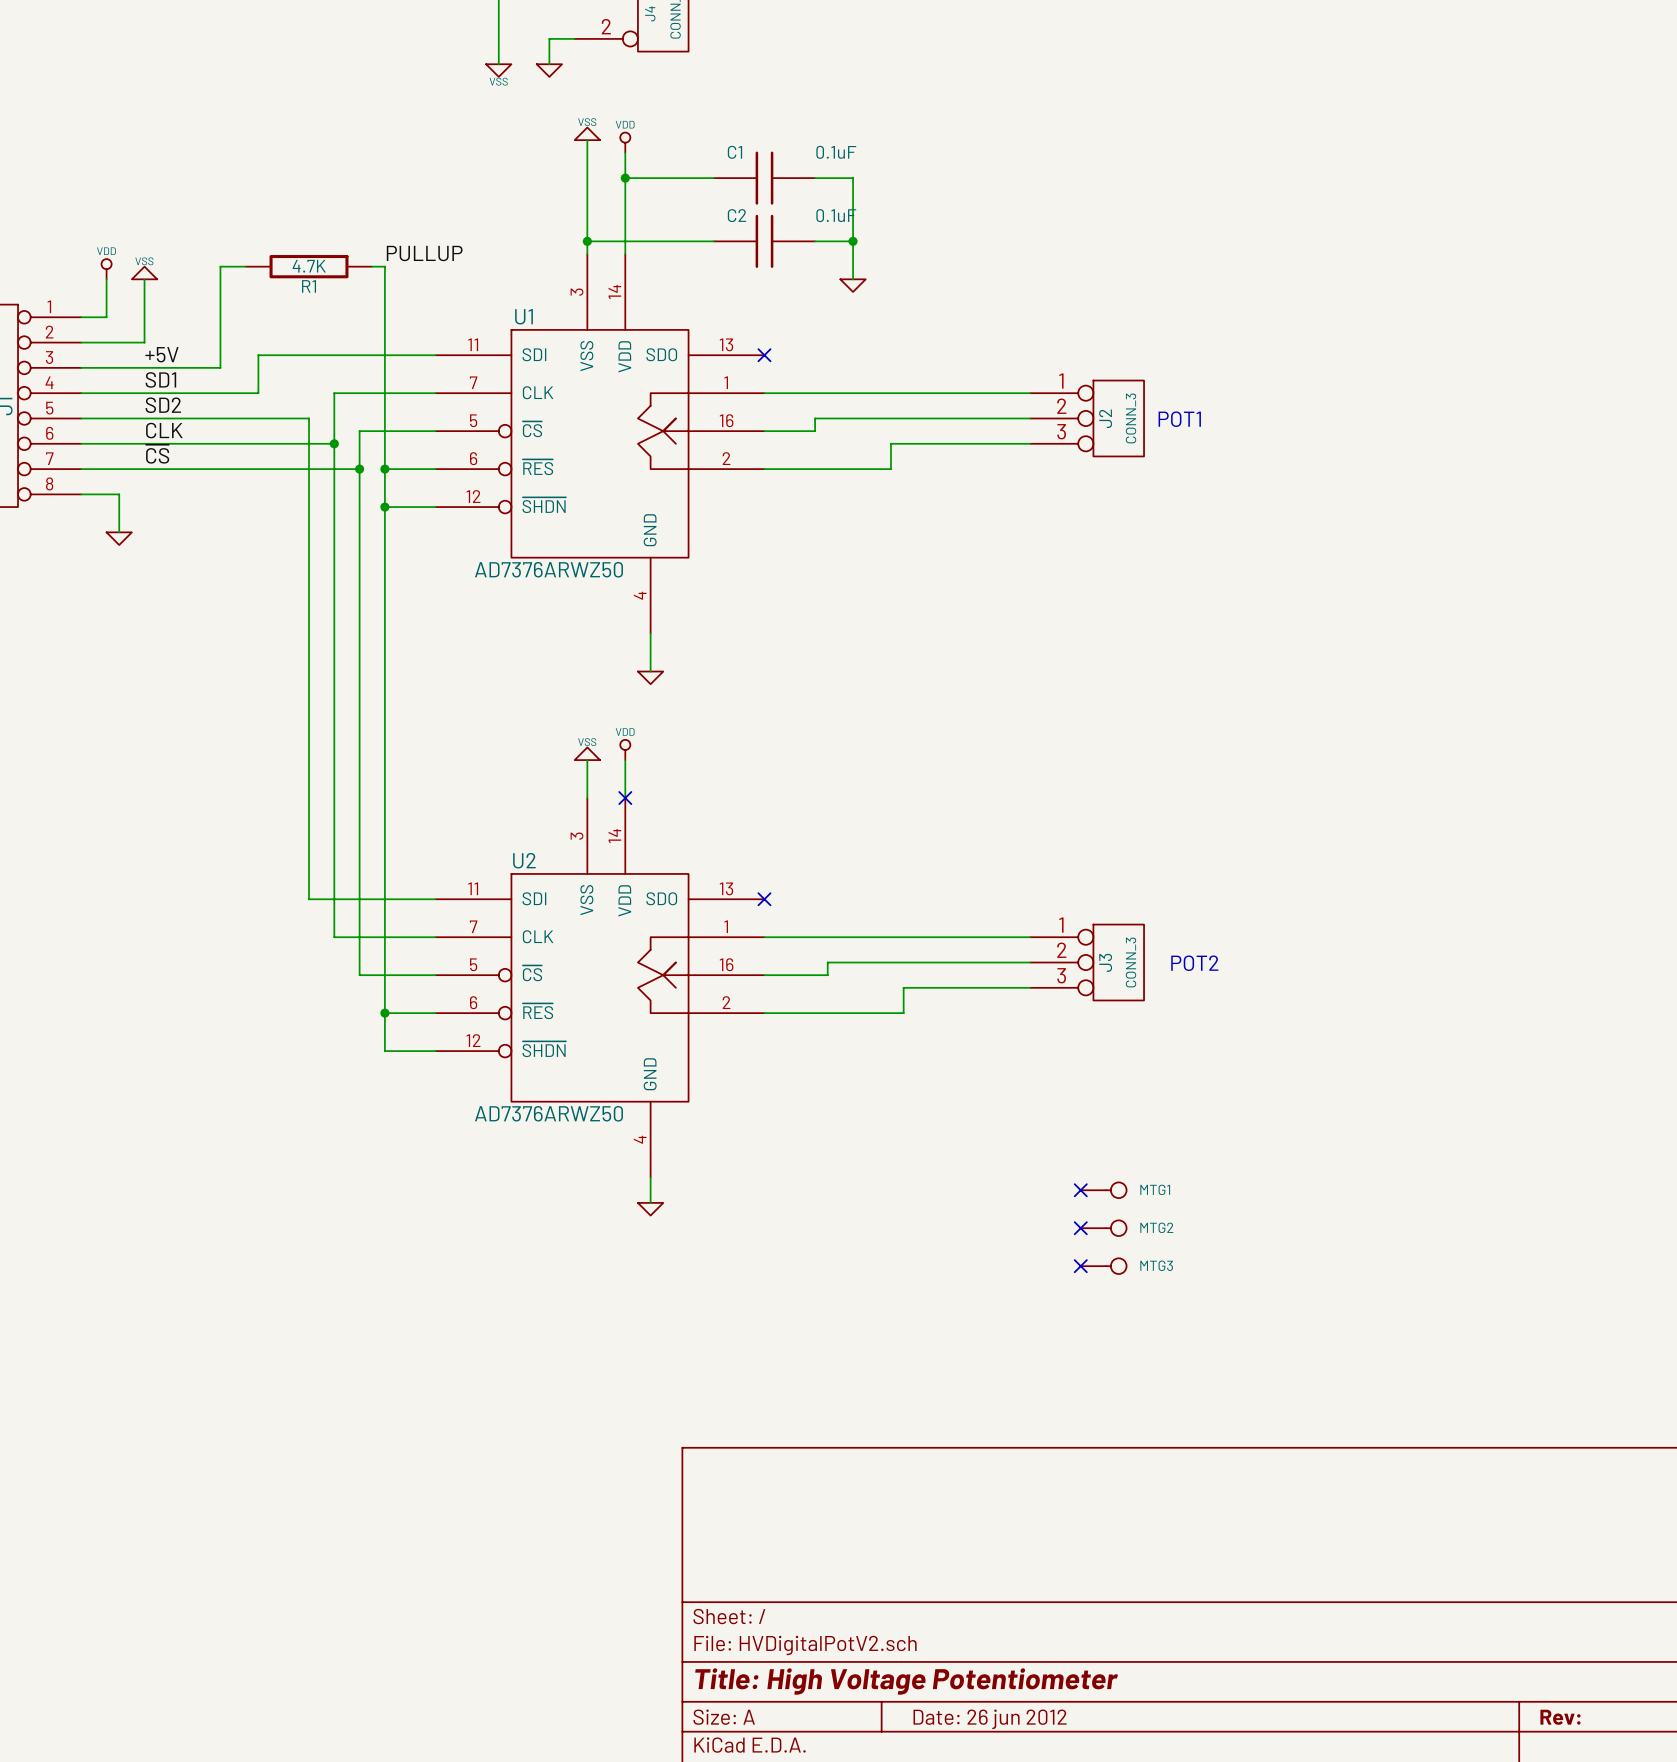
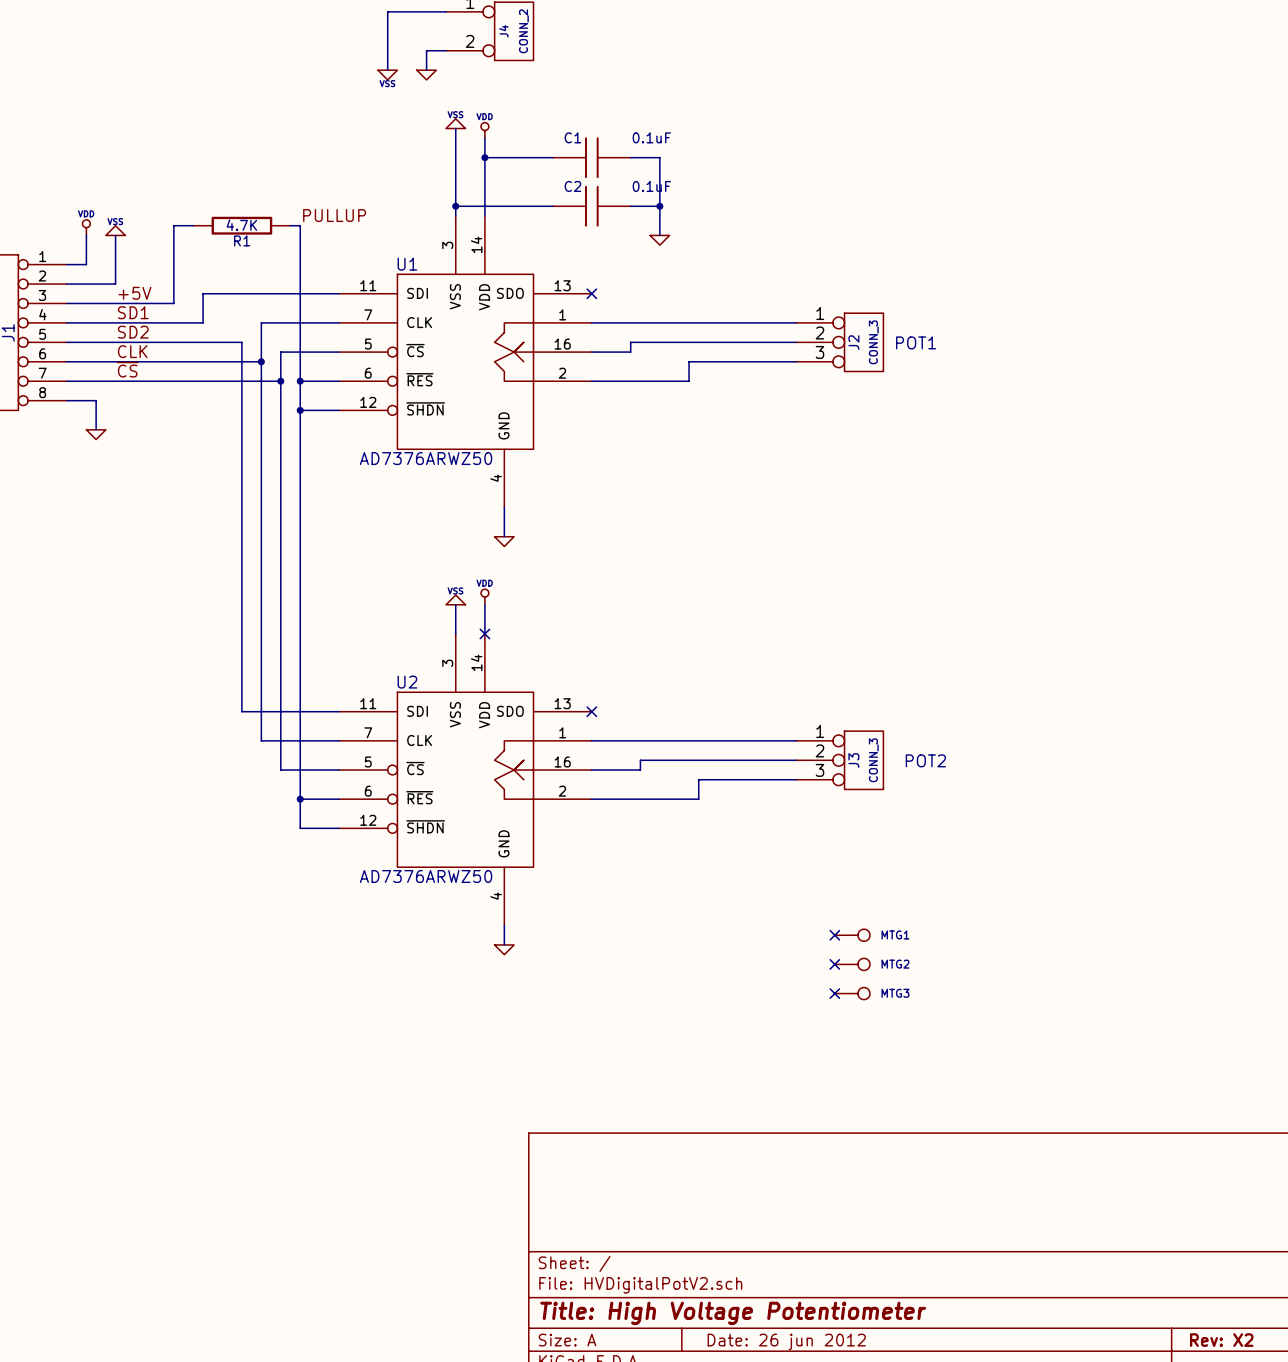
title block: Rev: (1560, 1717) -> Rev: X2 (1221, 1340)

